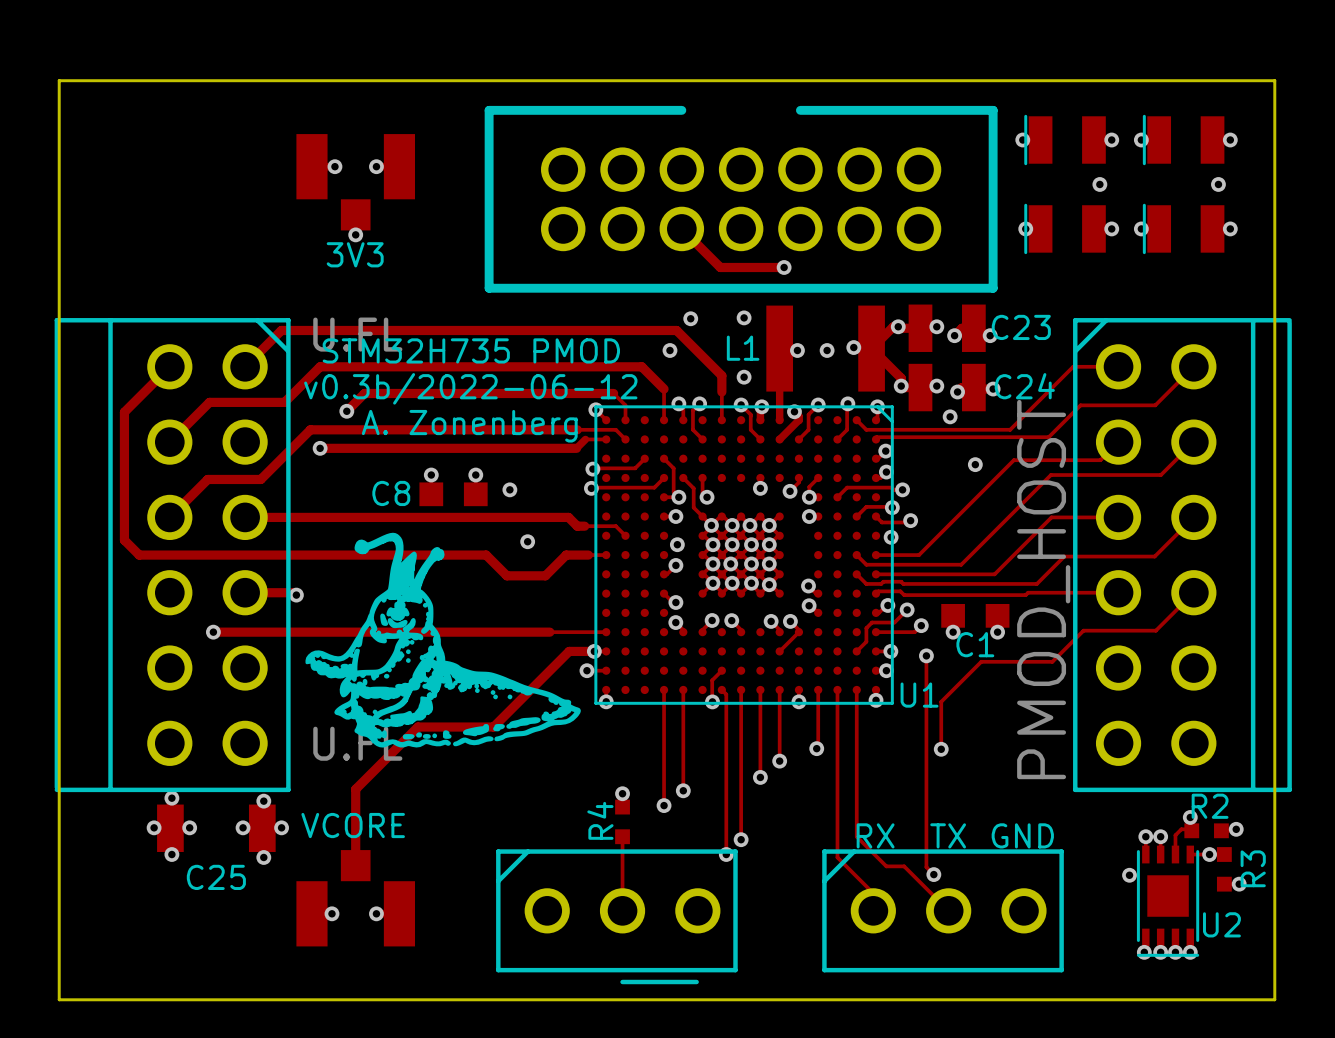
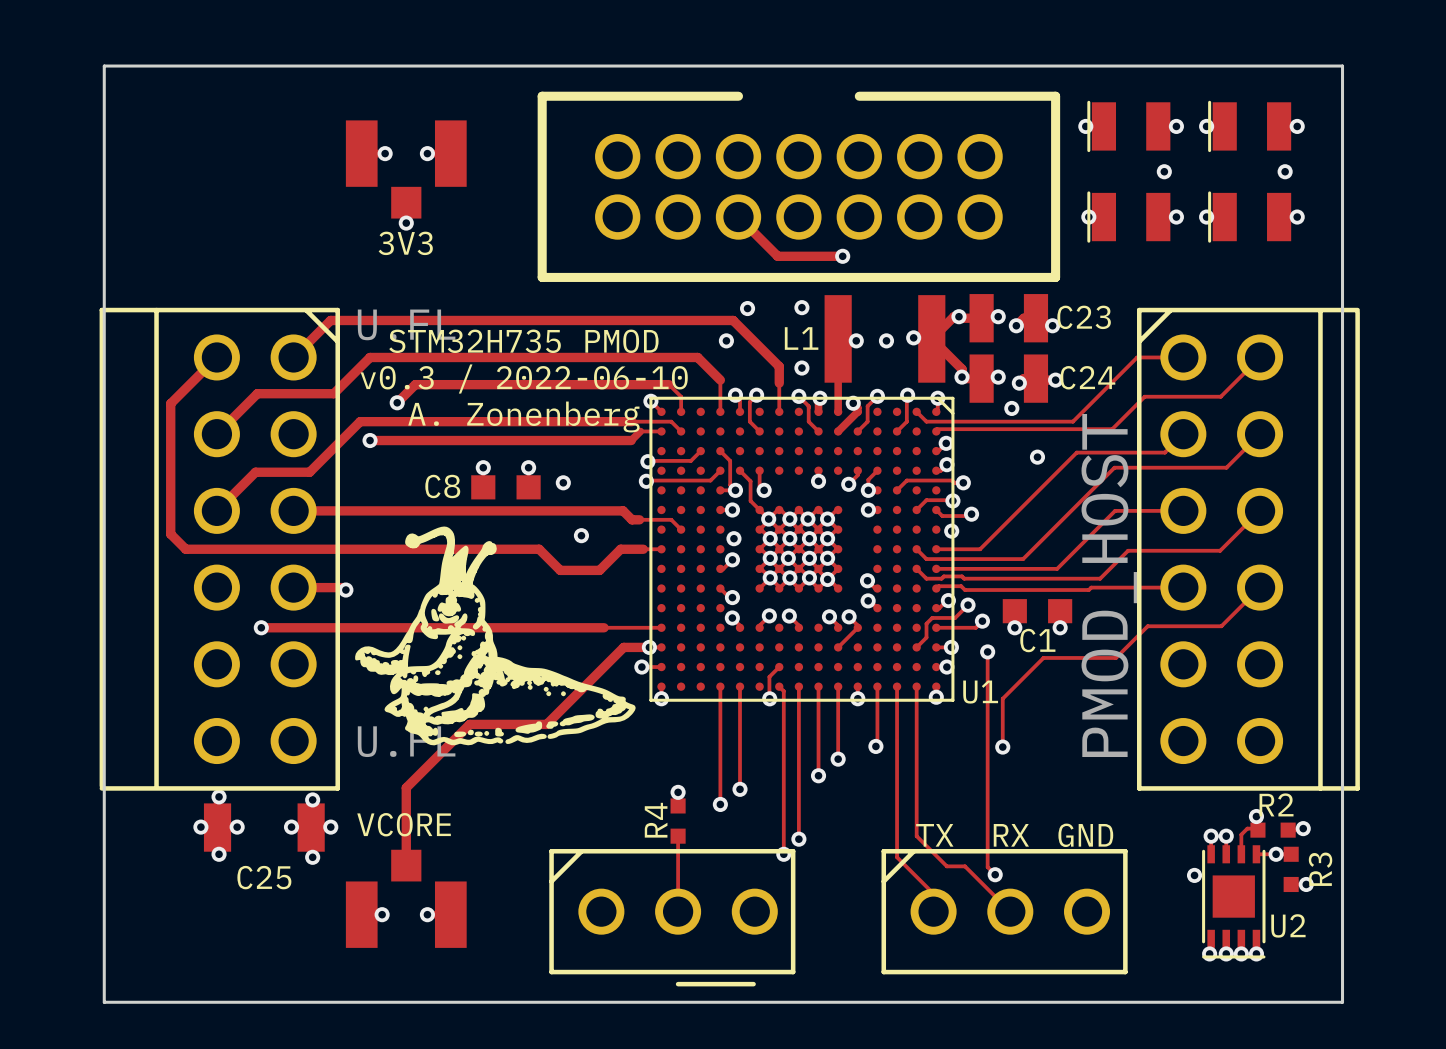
text: v0.3b/2022-06-12 (470, 388) -> v0.3 / 2022-06-10 (524, 379)
text: RX (875, 835) -> TX (934, 835)
text: TX (948, 835) -> RX (1011, 835)

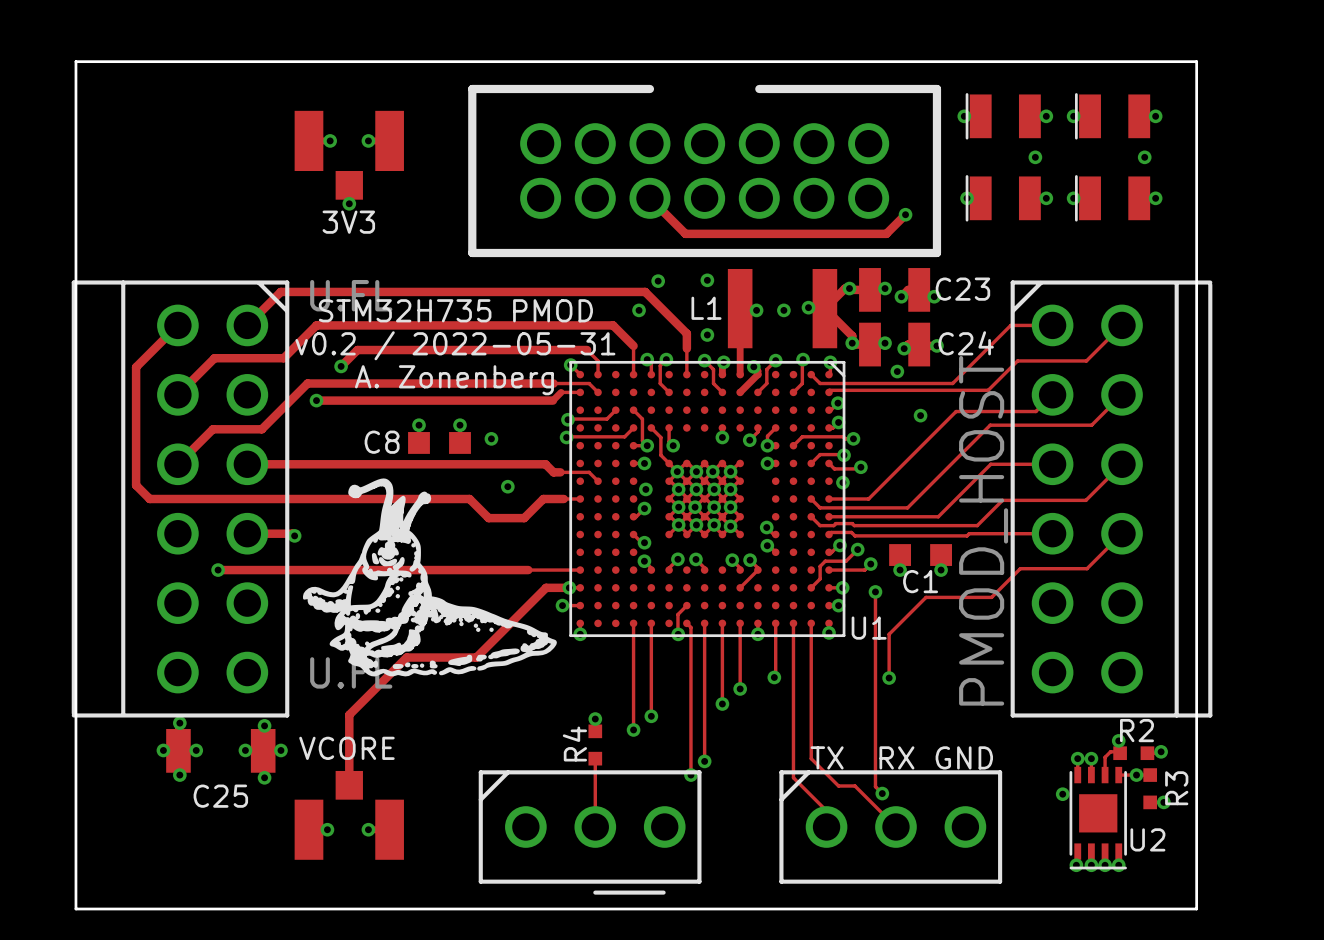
track: none -> (905, 214) (886, 233) (744, 233)
via position: (842, 256) -> (905, 214)
text: v0.3 / 2022-06-10 (524, 379) -> v0.2 / 2022-05-31 (455, 345)

